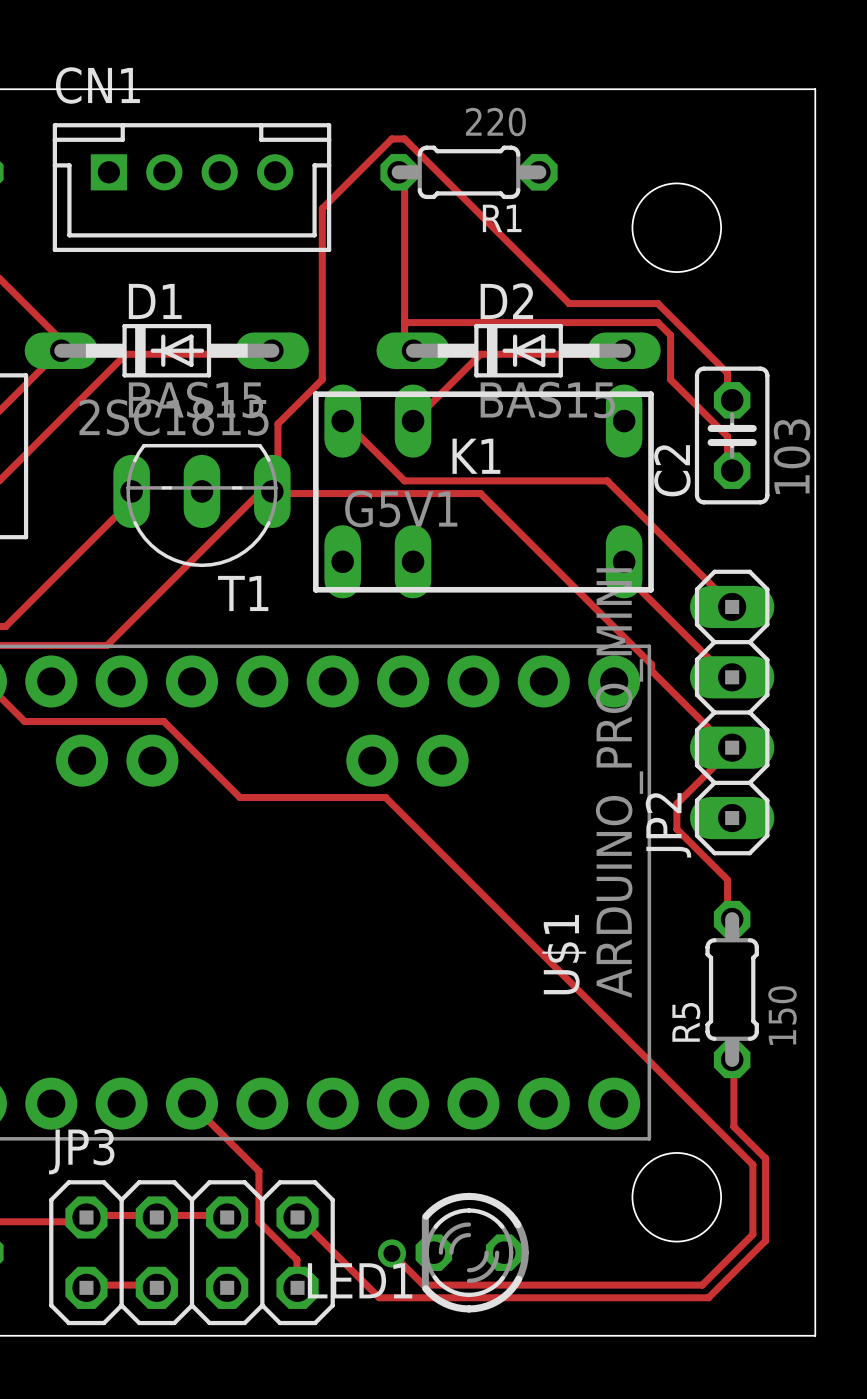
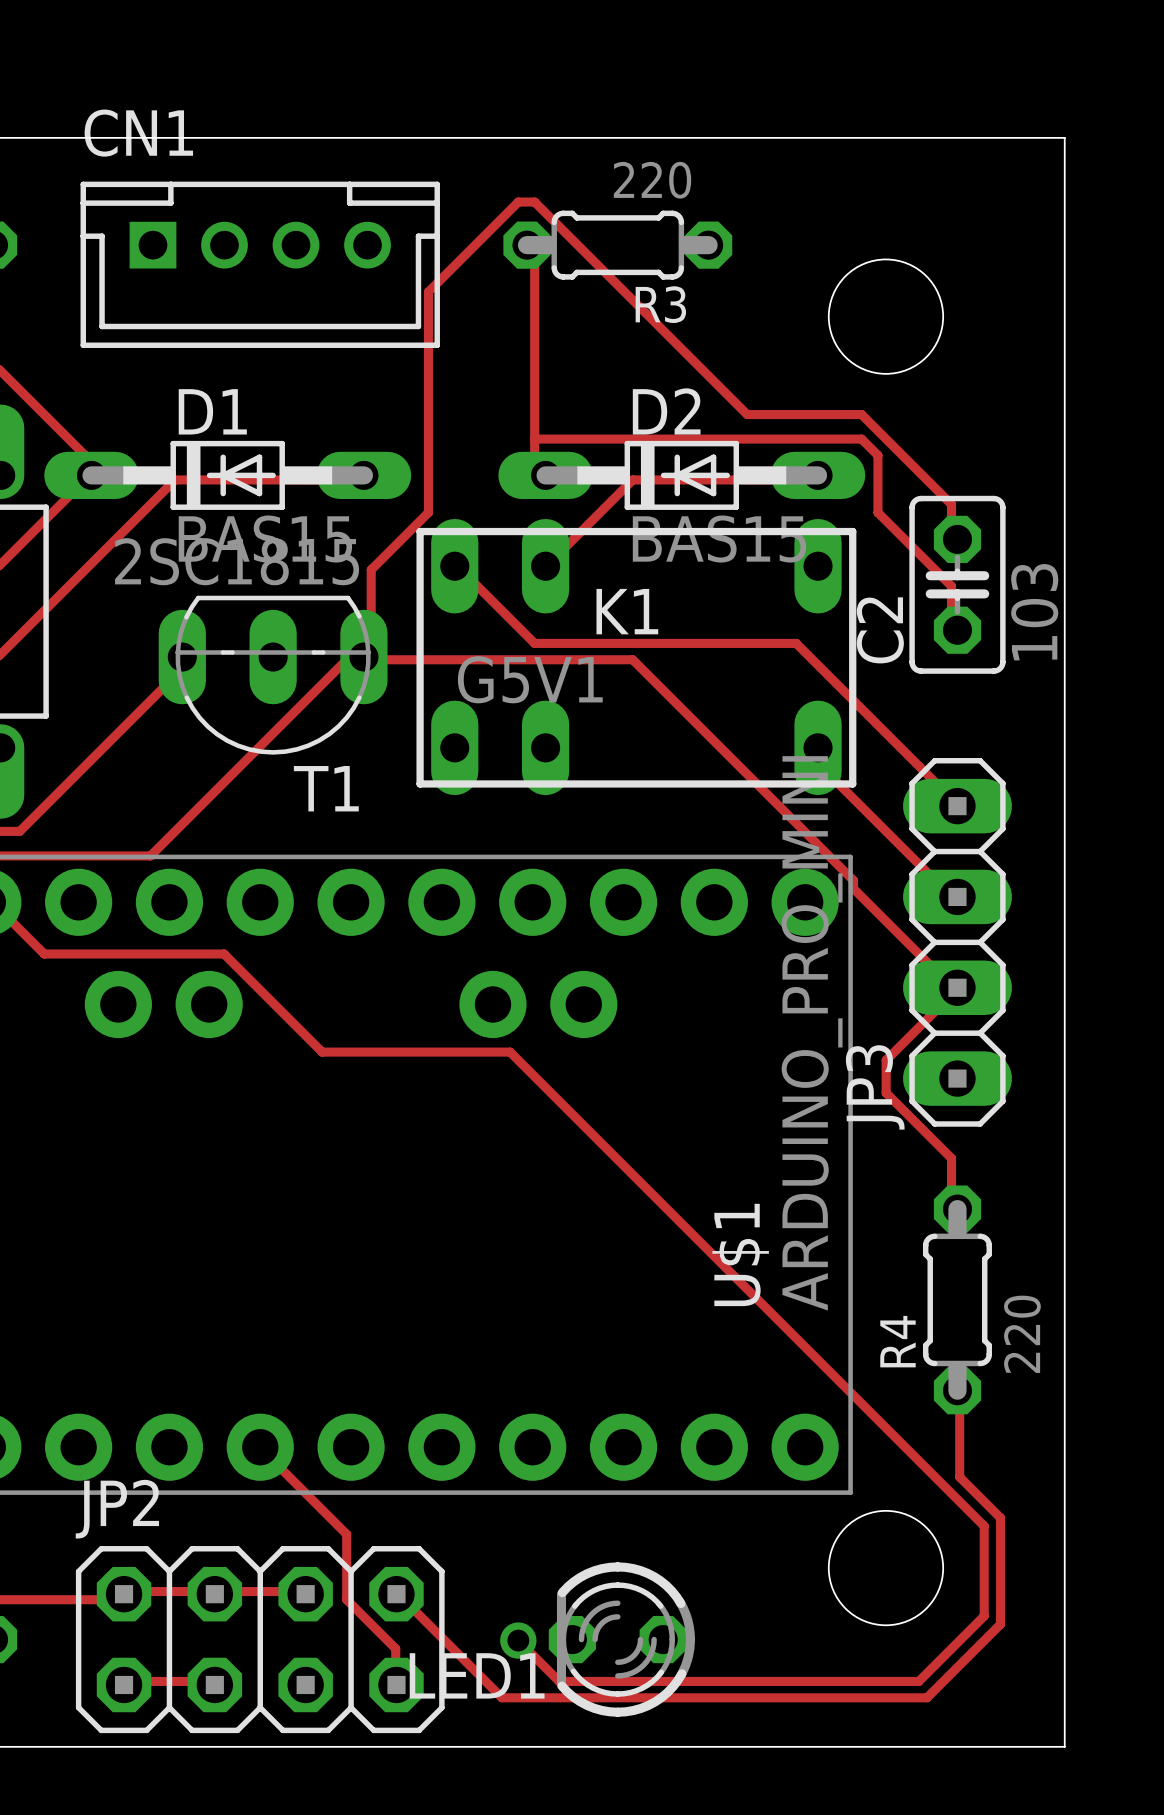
R1 name: R1 (502, 218) -> R3 (660, 304)
JP2 name: JP2 (668, 825) -> JP3 (875, 1087)
R5 value: 150 (782, 1015) -> 220 (1022, 1334)
R5 name: R5 (686, 1022) -> R4 (897, 1341)
JP3 name: JP3 (81, 1151) -> JP2 (117, 1509)

